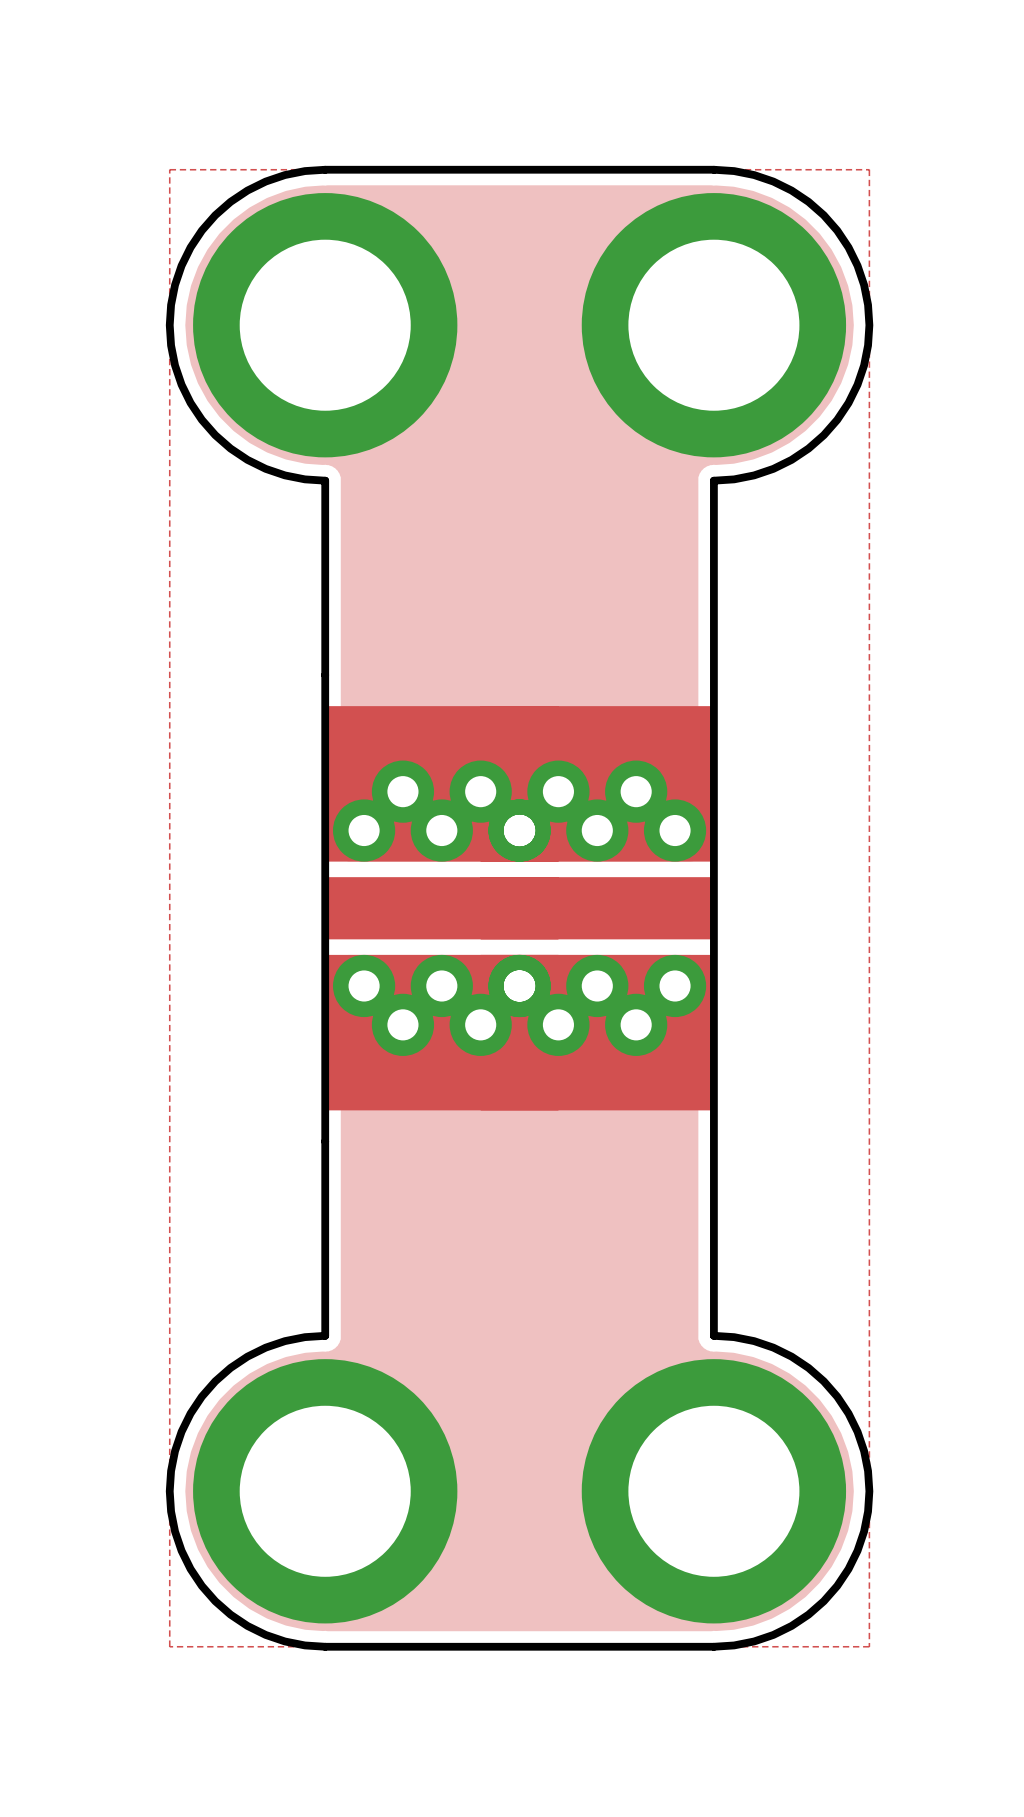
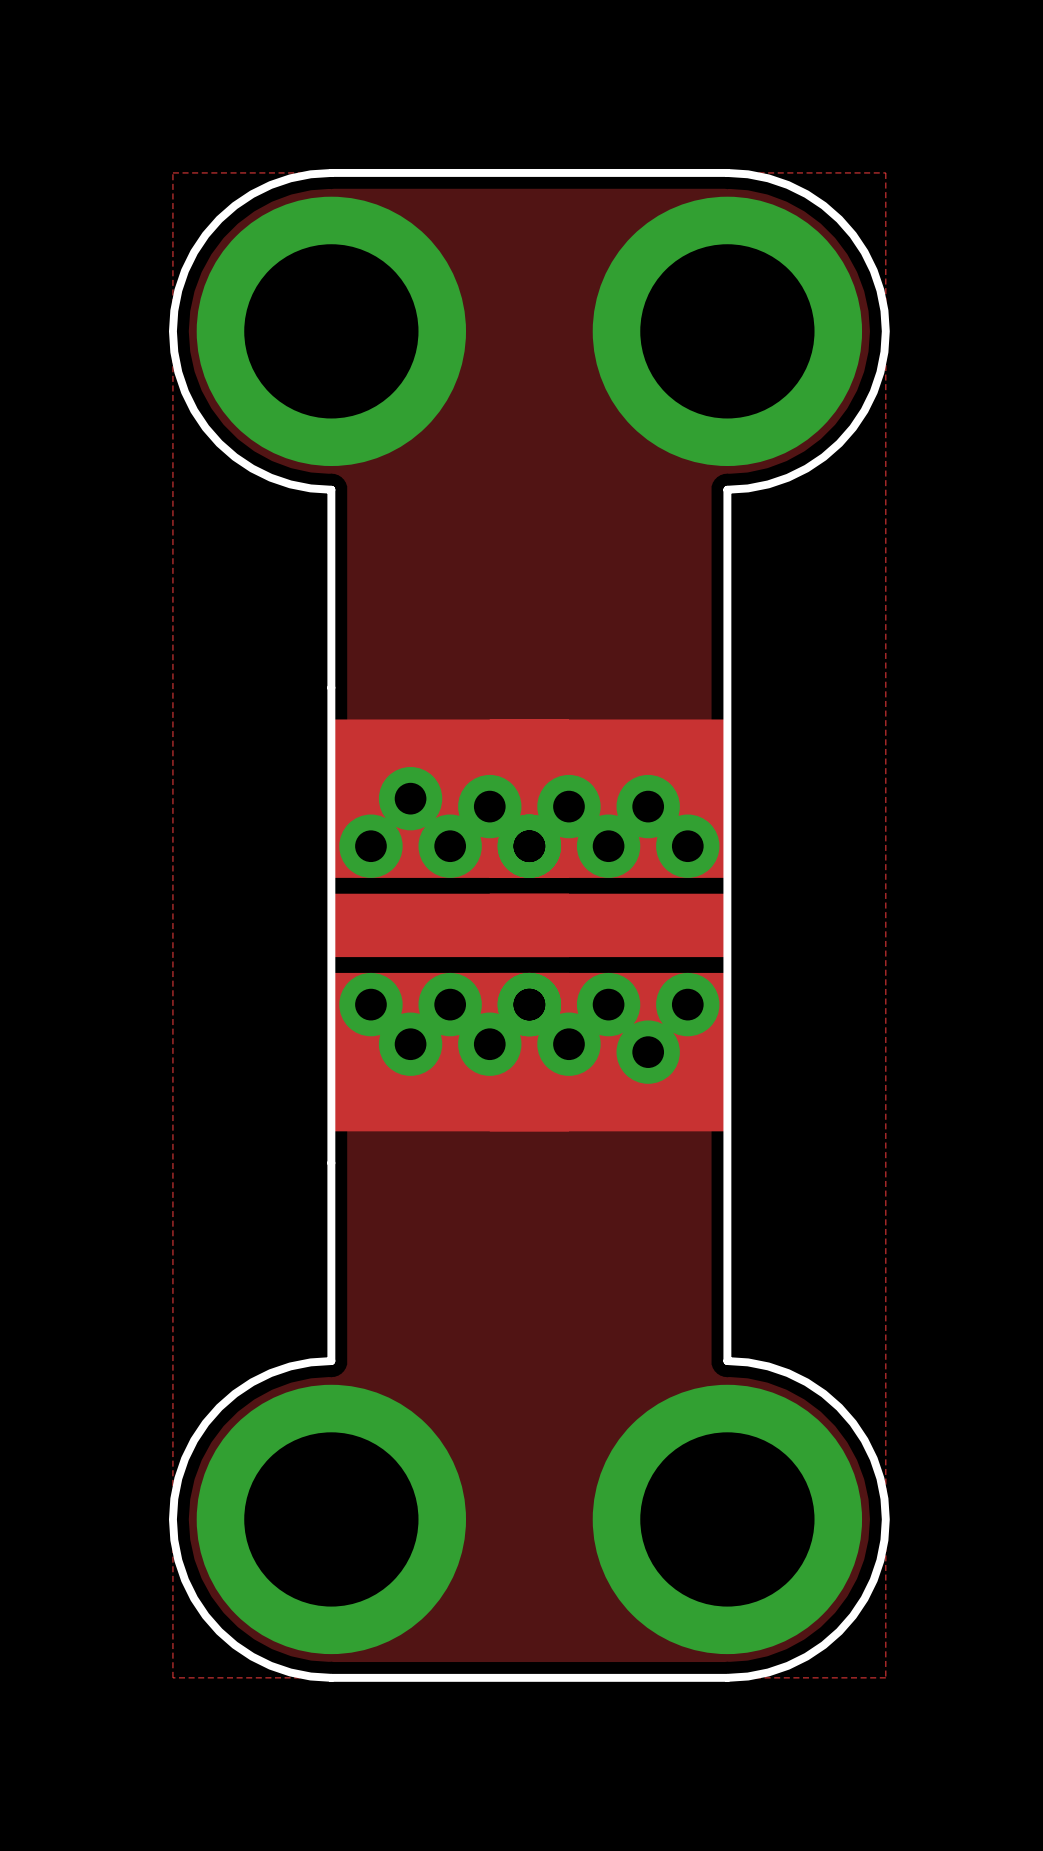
part footprint: [325, 706, 559, 1111] -> [331, 719, 569, 1132]
part footprint: [480, 706, 714, 1111] -> [489, 719, 728, 1132]

